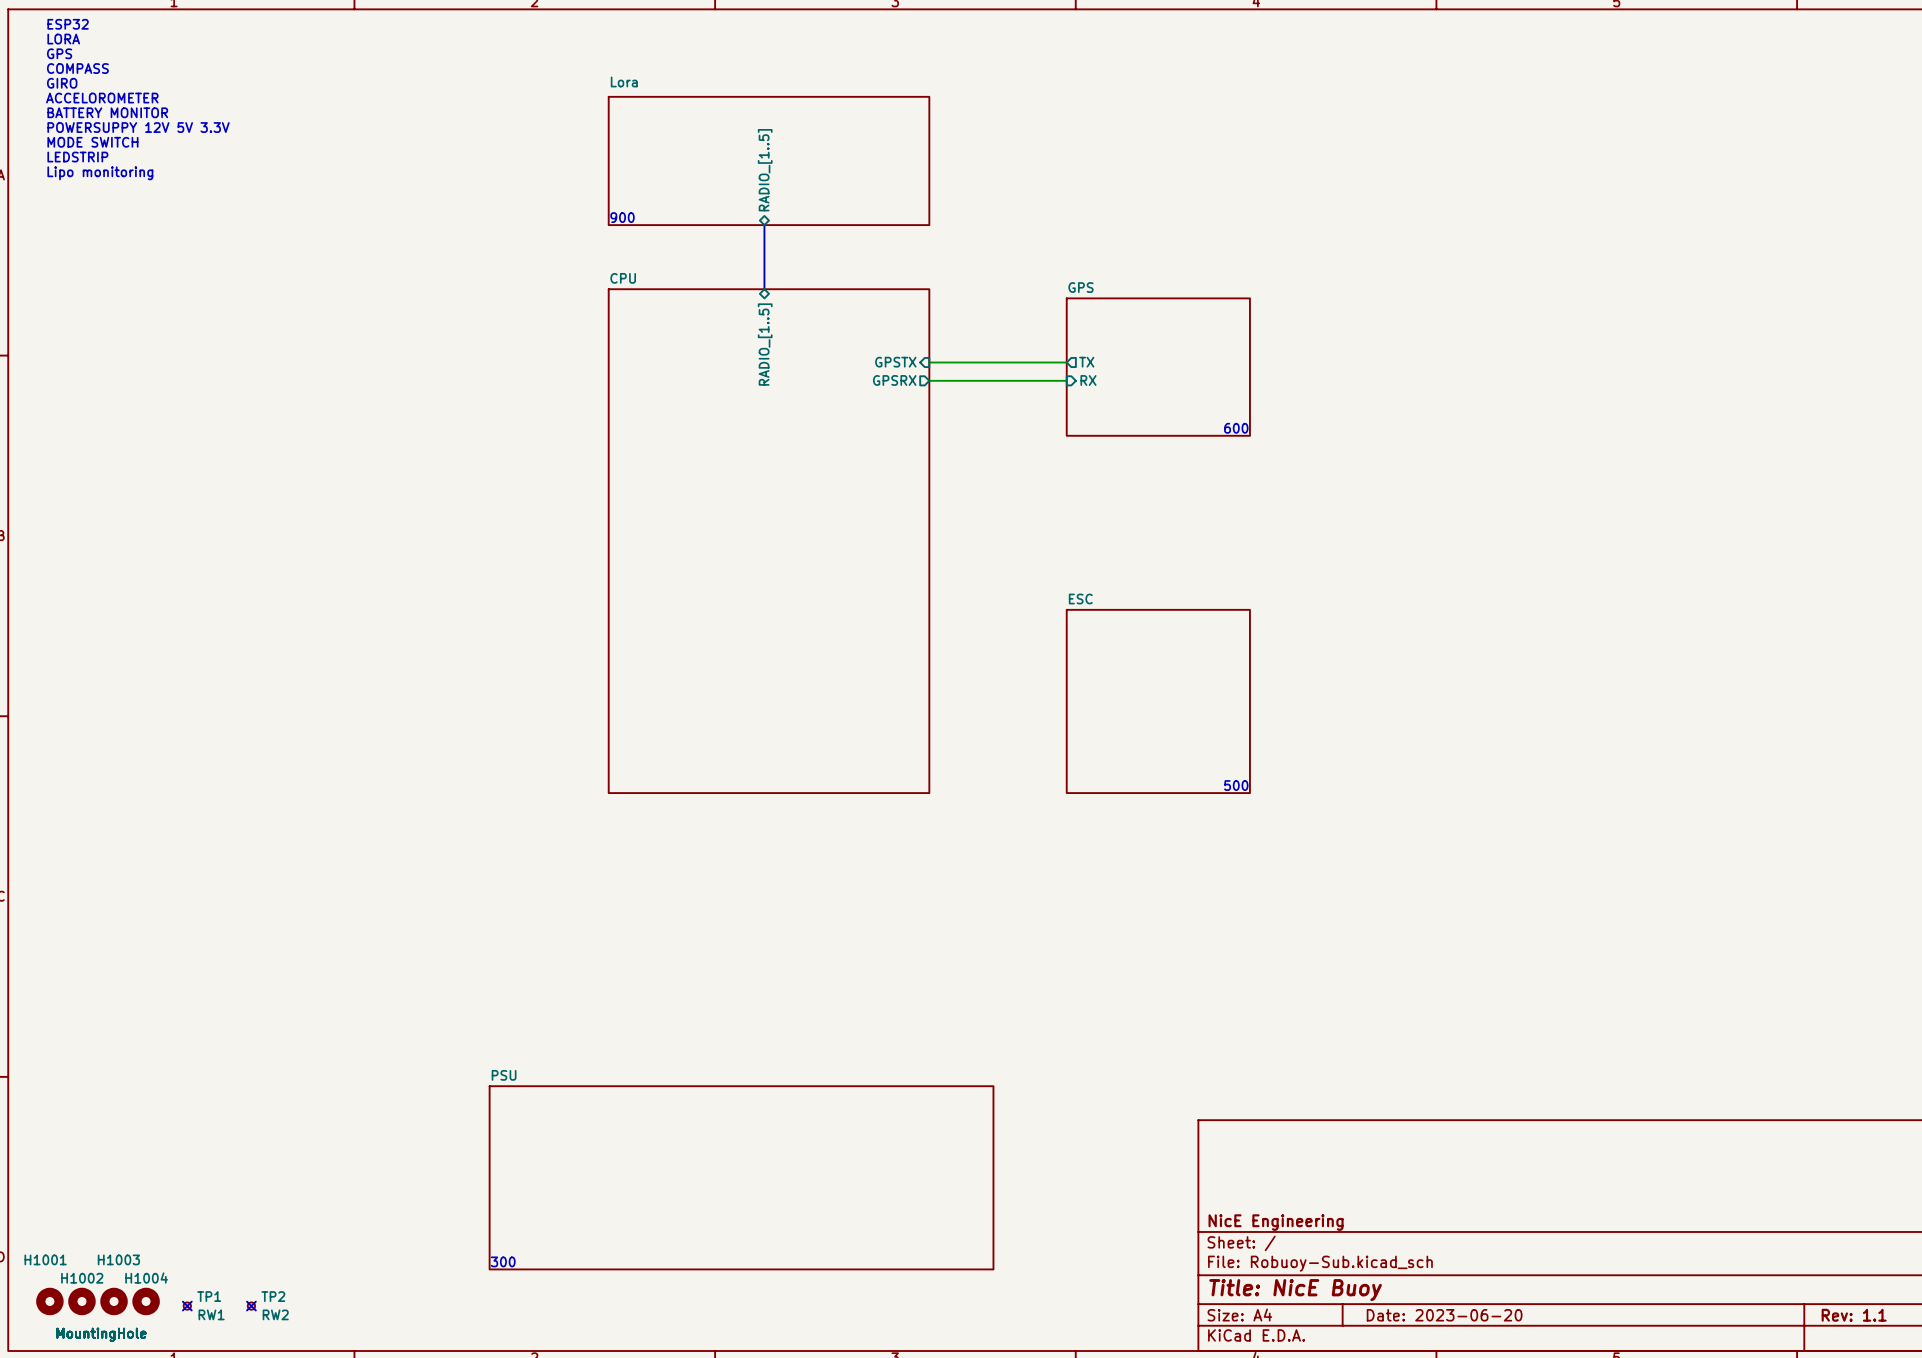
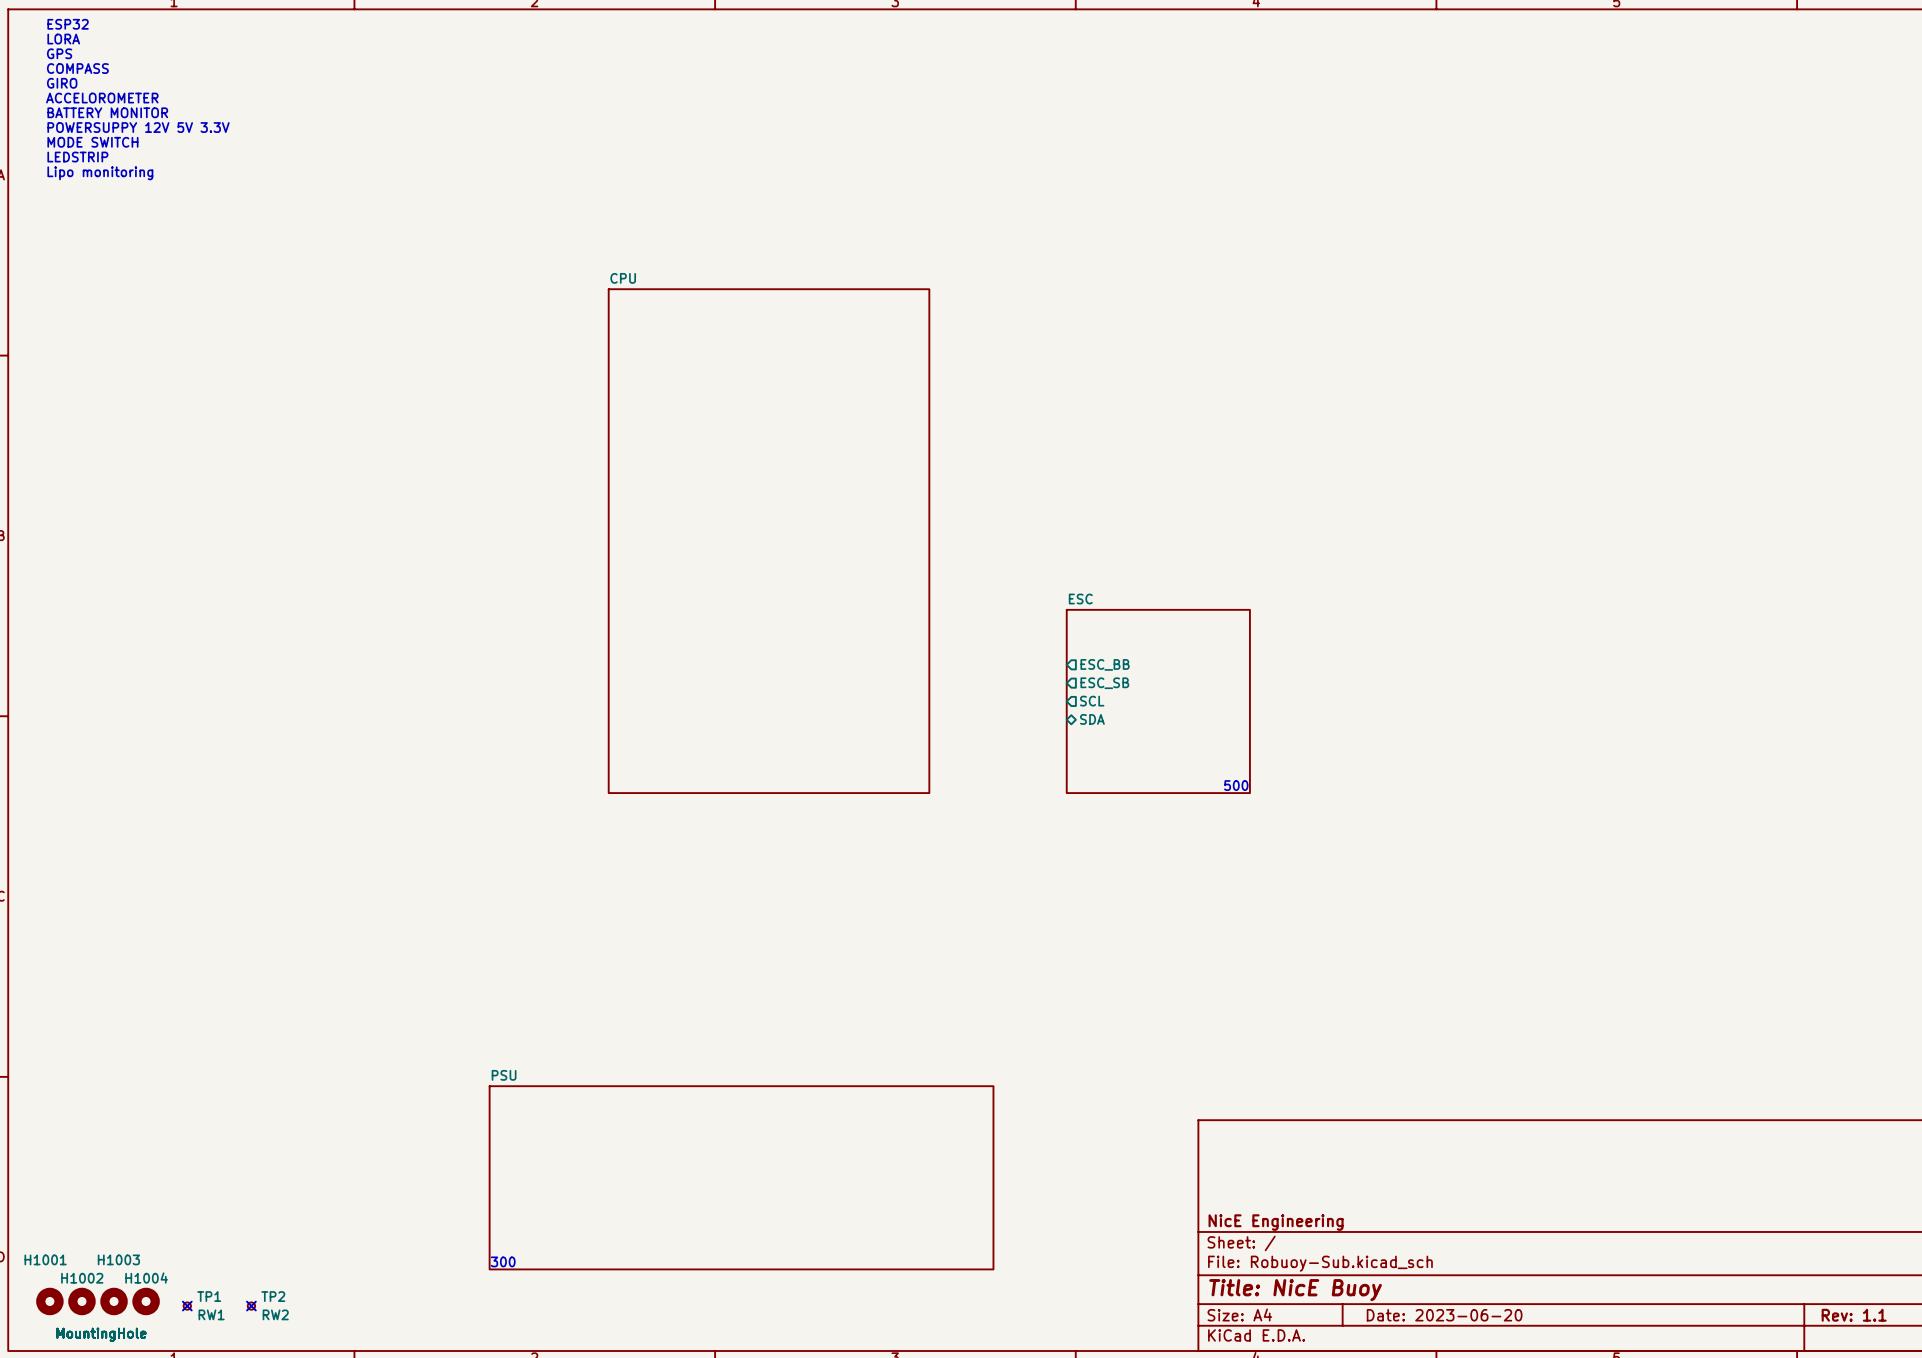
sheet Lora: (769, 160) -> none
sheet pin: RADIO_[1..5] (765, 170) -> none
text: 900 (622, 217) -> none
bus: (764, 225) (764, 289) -> none
sheet pin: RADIO_[1..5] (765, 344) -> none
sheet pin: GPSTX (895, 362) -> none
wire: (929, 362) (1066, 362) -> none
sheet pin: TX (1086, 362) -> none
sheet GPS: (1158, 367) -> none
sheet pin: GPSRX (894, 380) -> none
wire: (929, 380) (1066, 380) -> none
sheet pin: RX (1088, 380) -> none
text: 600 (1236, 428) -> none
sheet pin: none -> ESC_BB (1105, 664)
sheet pin: none -> ESC_SB (1104, 683)
sheet pin: none -> SCL (1092, 701)
sheet pin: none -> SDA (1092, 719)

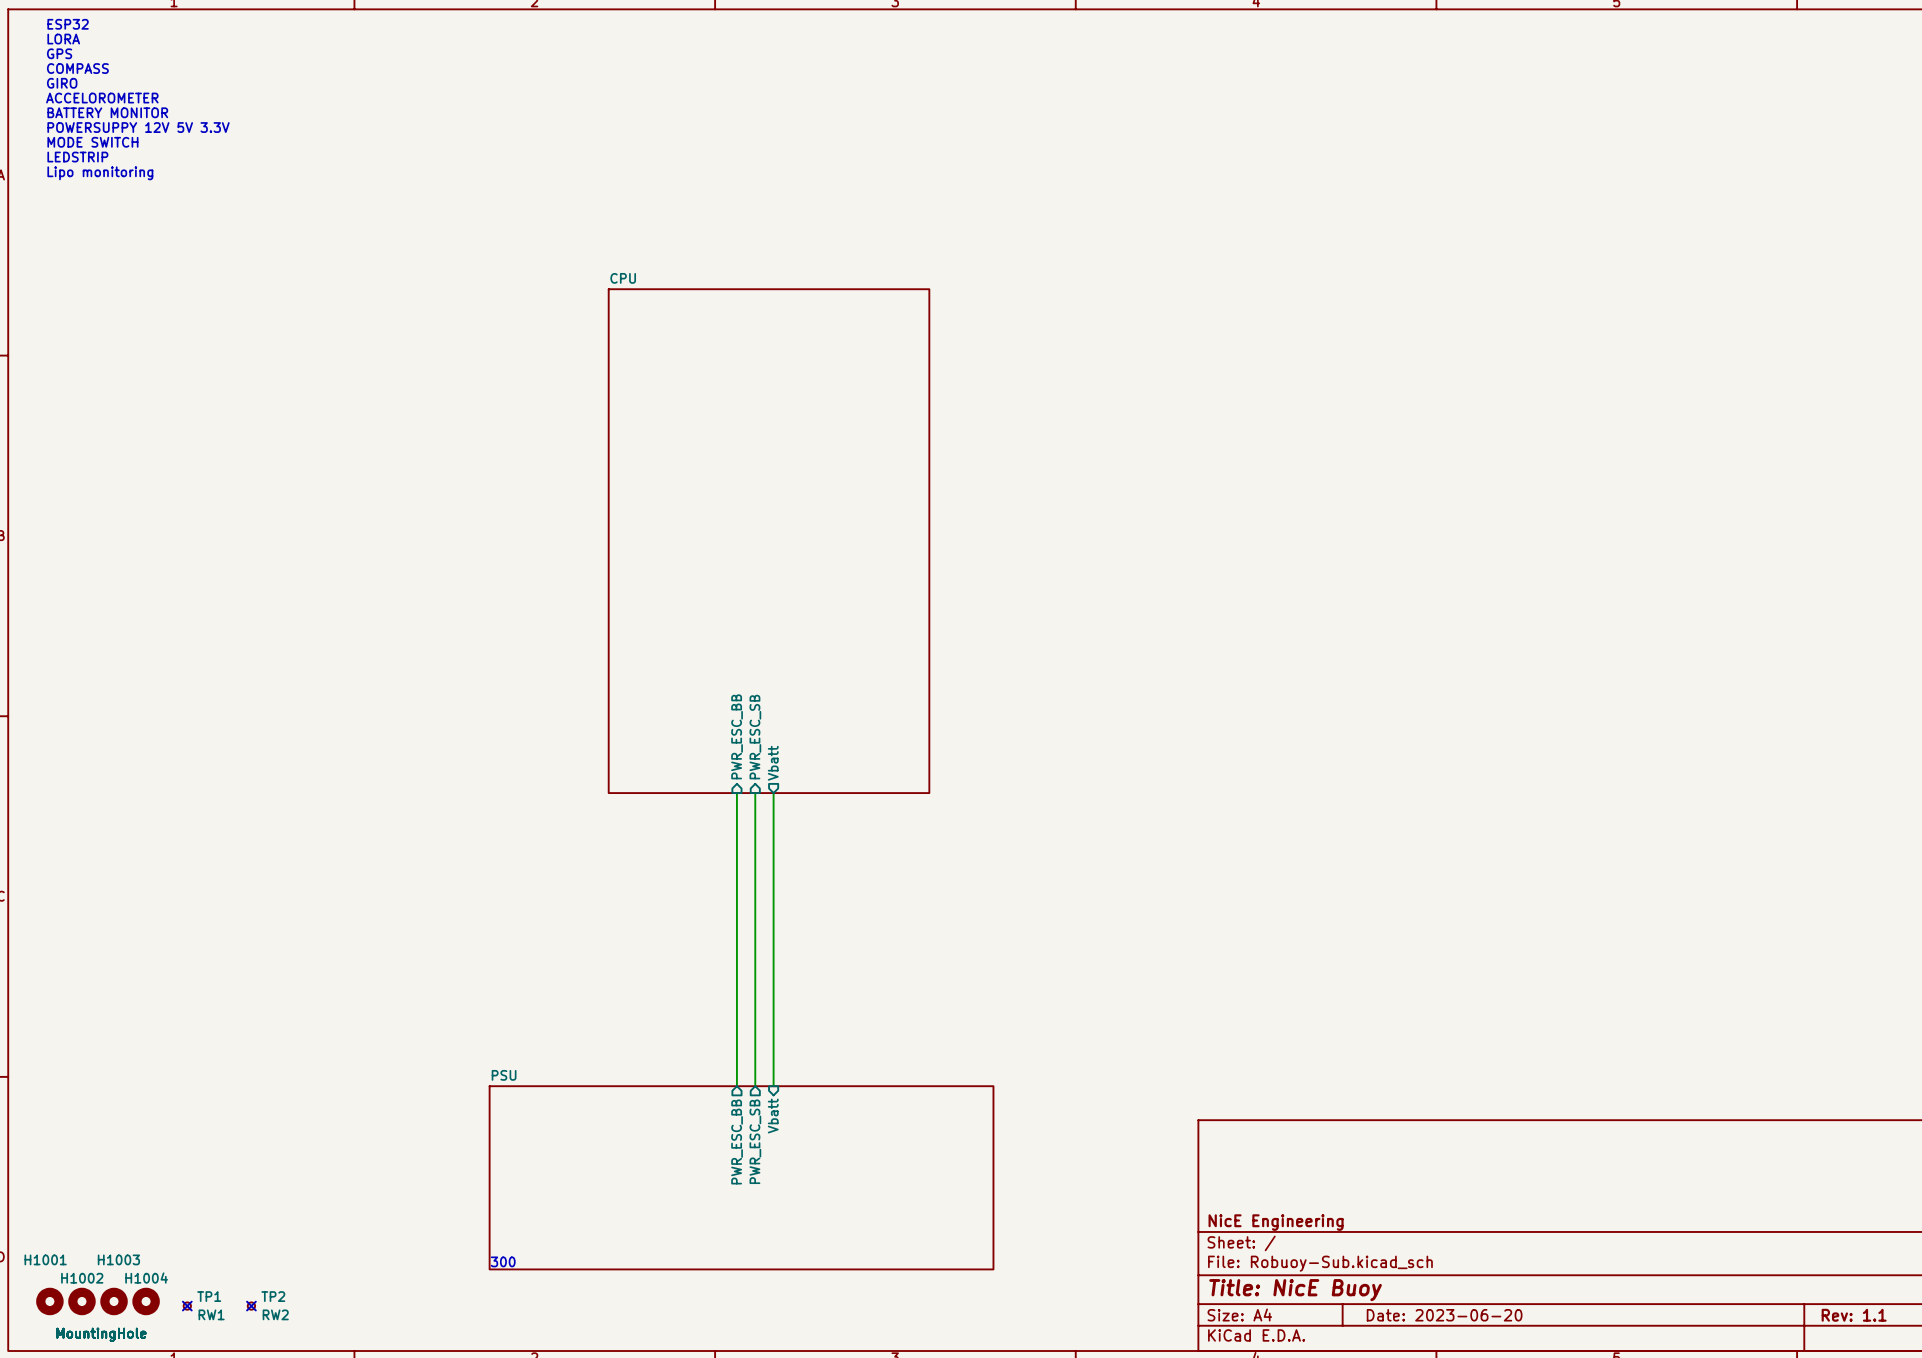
sheet pin: ESC_BB (1105, 664) -> none
sheet pin: ESC_SB (1104, 683) -> none
sheet pin: SCL (1092, 701) -> none
sheet ESC: (1158, 701) -> none
sheet pin: SDA (1092, 719) -> none
sheet pin: none -> PWR_ESC_BB (737, 736)
sheet pin: none -> PWR_ESC_SB (755, 737)
sheet pin: none -> Vbatt (773, 763)
text: 500 (1236, 785) -> none
wire: none -> (736, 793) (736, 1086)
wire: none -> (755, 793) (755, 1086)
wire: none -> (773, 793) (773, 1086)
sheet pin: none -> Vbatt (773, 1116)
sheet pin: none -> PWR_ESC_BB (737, 1141)
sheet pin: none -> PWR_ESC_SB (755, 1141)

